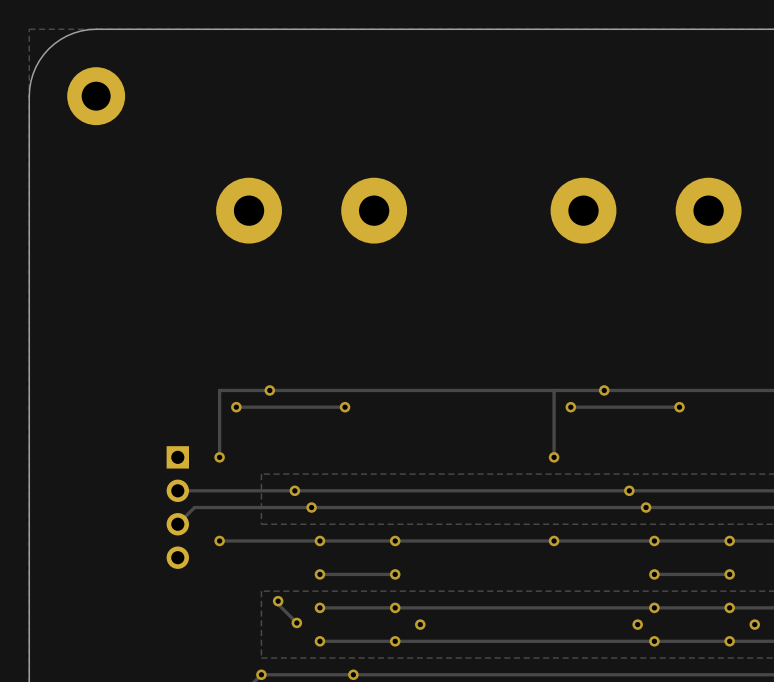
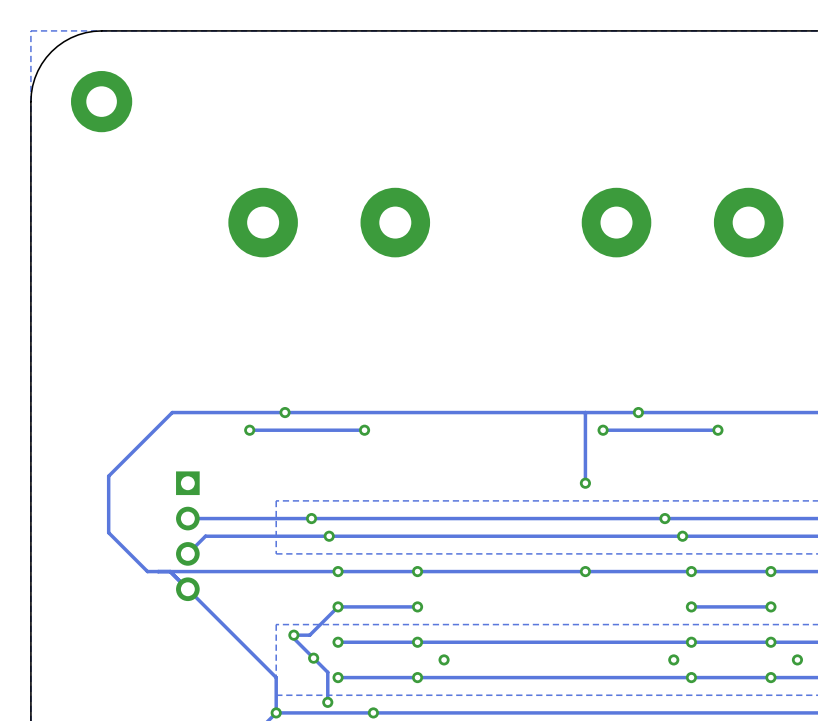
track: (219, 390) (219, 457) -> (232, 412) (172, 412) (108, 476) (108, 532) (147, 571) (232, 571)
via: (219, 457) -> none
track: none -> (170, 571) (276, 677) (276, 712)
via: (219, 540) -> none
track: none -> (338, 606) (309, 635) (293, 635)
track: none -> (313, 658) (327, 672) (327, 702)
via: none -> (327, 702)

